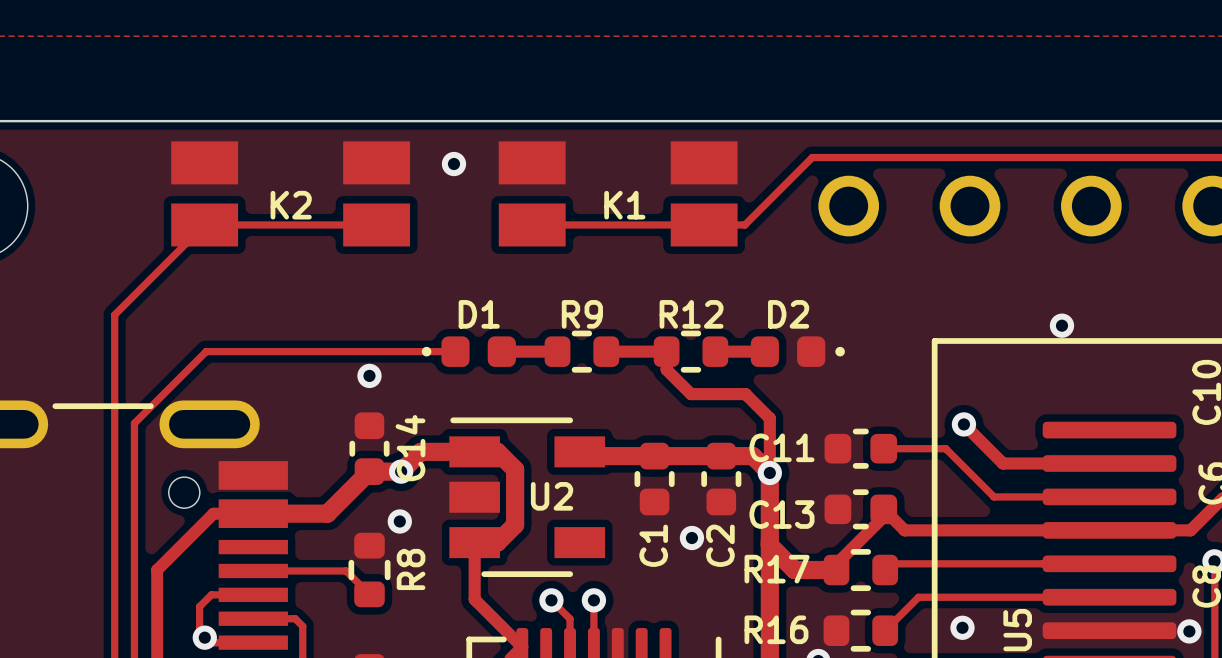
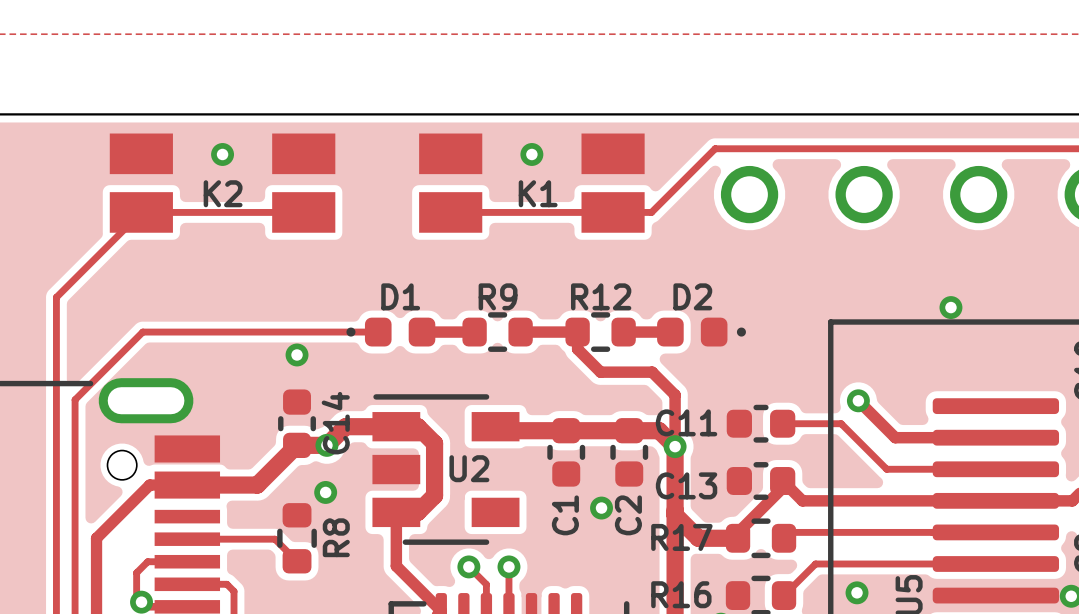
via: none -> (222, 154)
via: none -> (531, 154)
via: (453, 164) -> none

